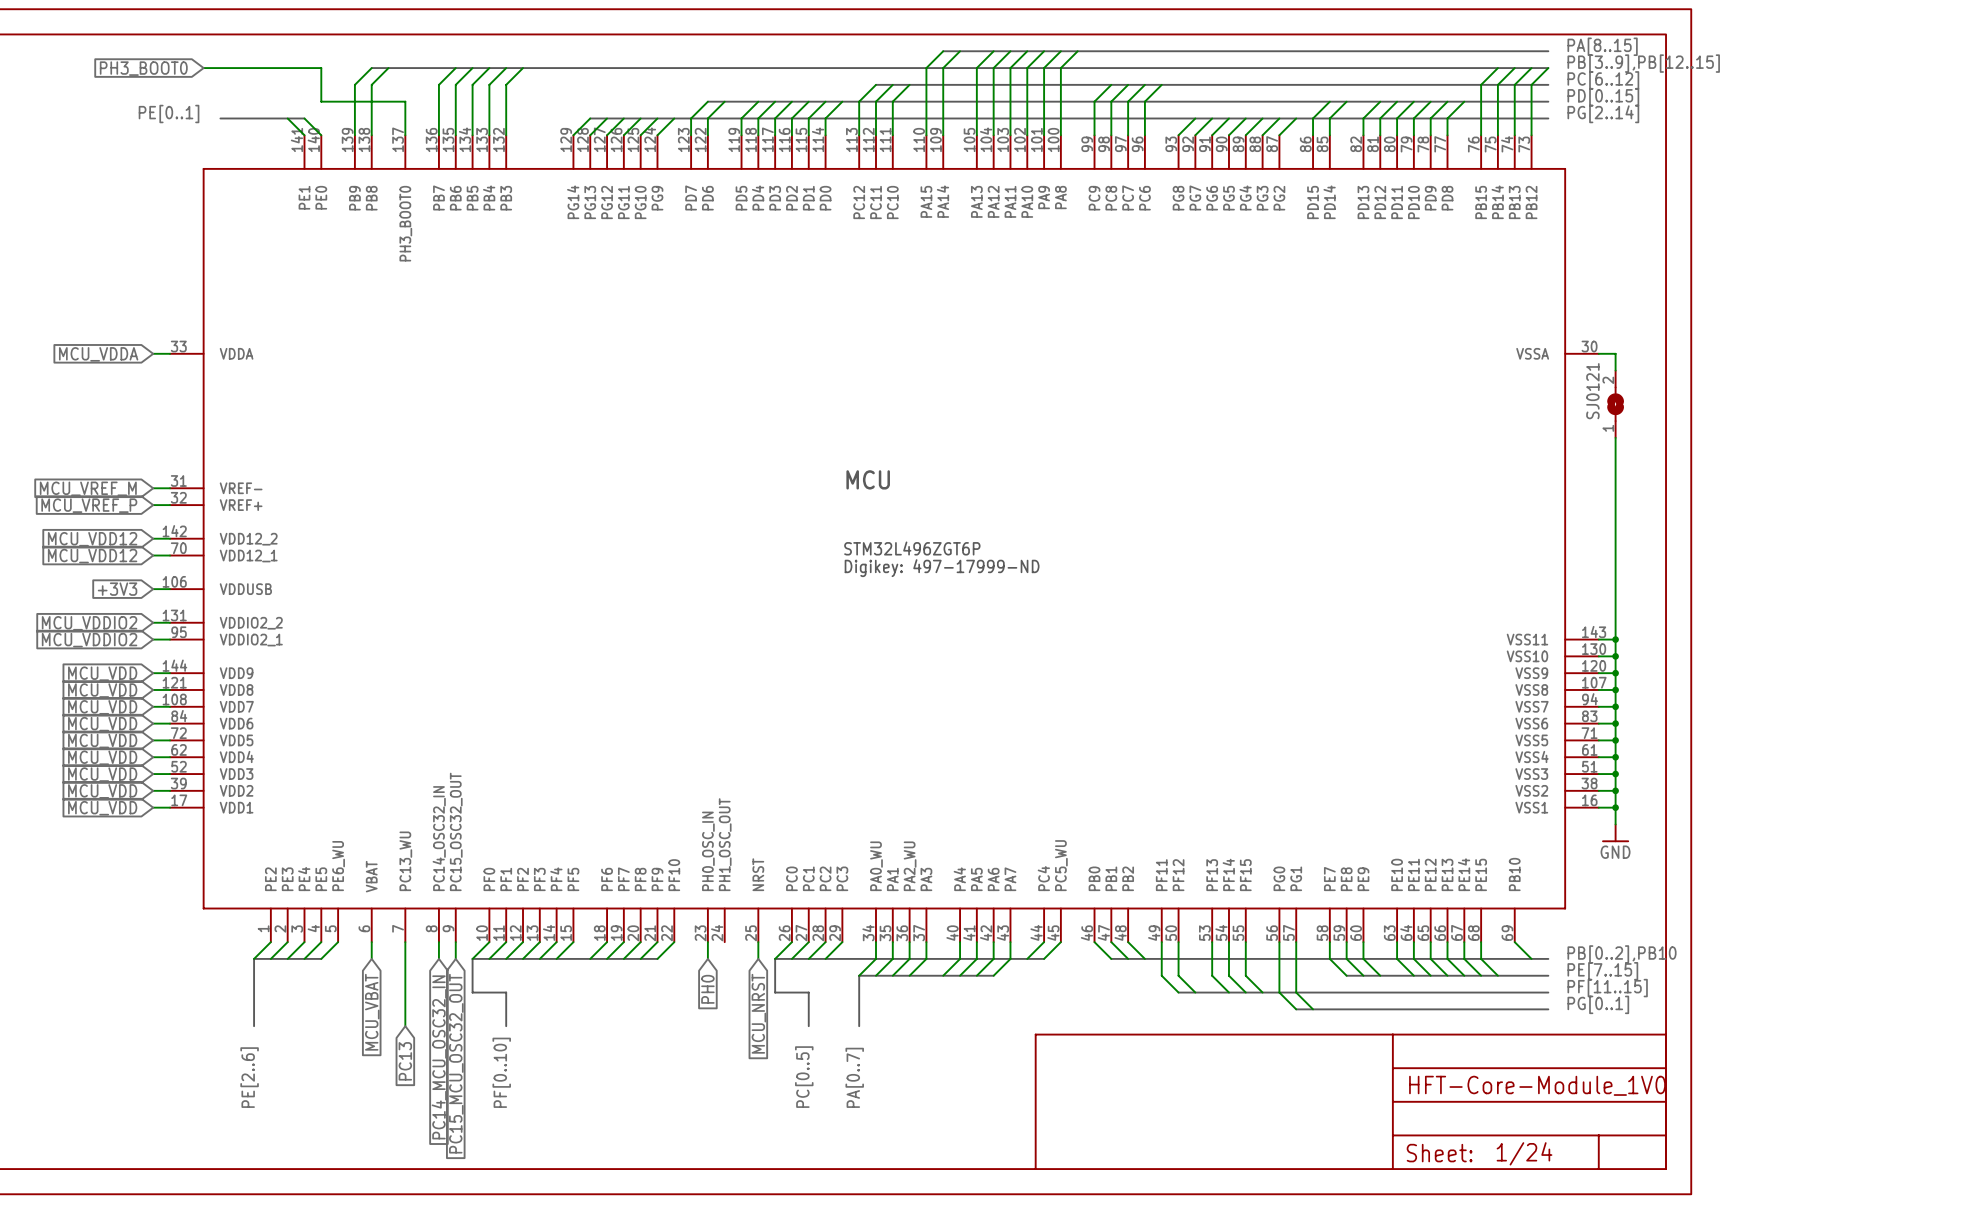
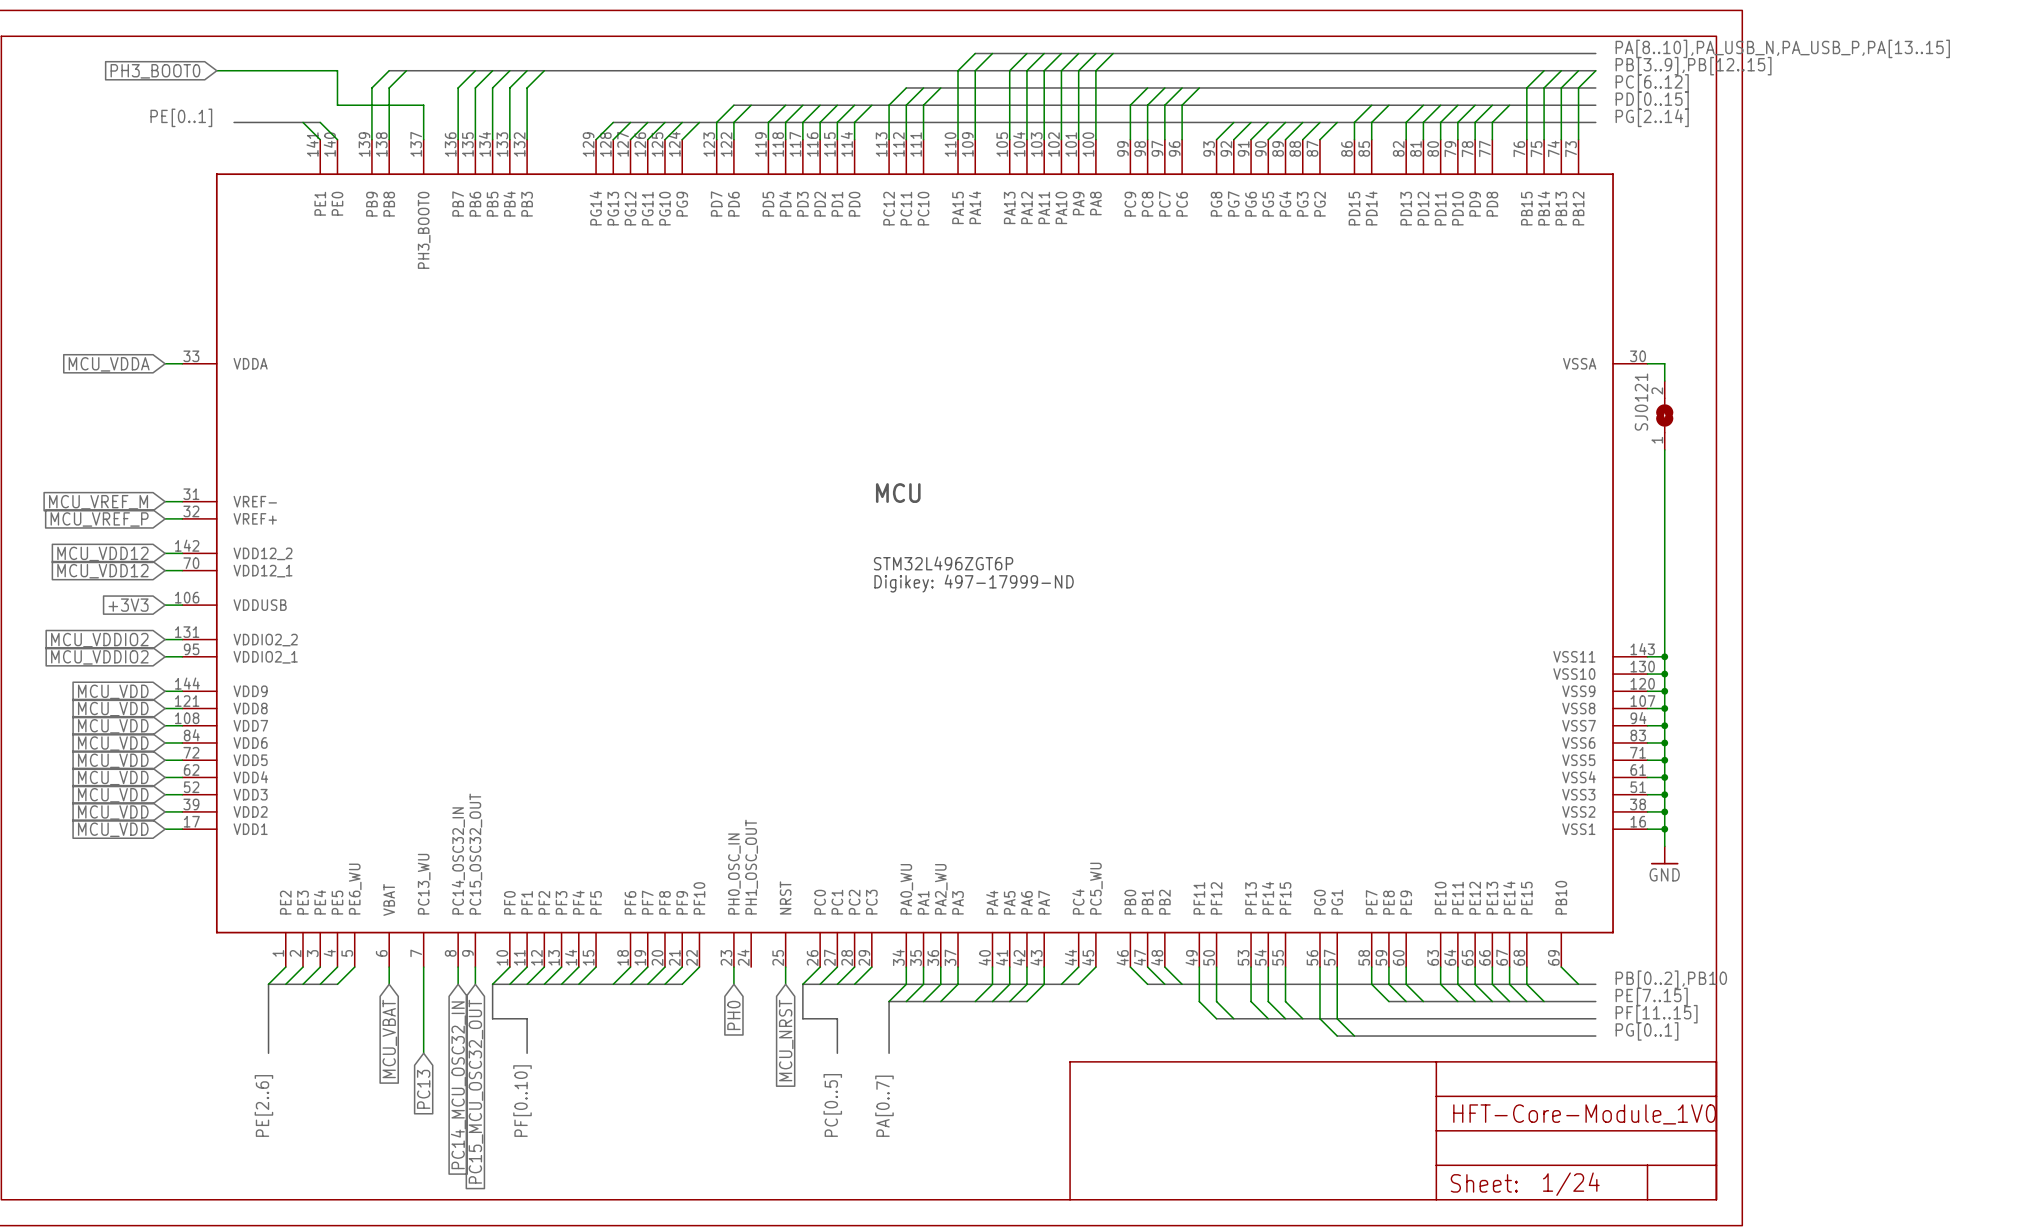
label: PA[8..15] (1602, 46) -> PA[8..10],PA_USB_N,PA_USB_P,PA[13..15] (1782, 48)

